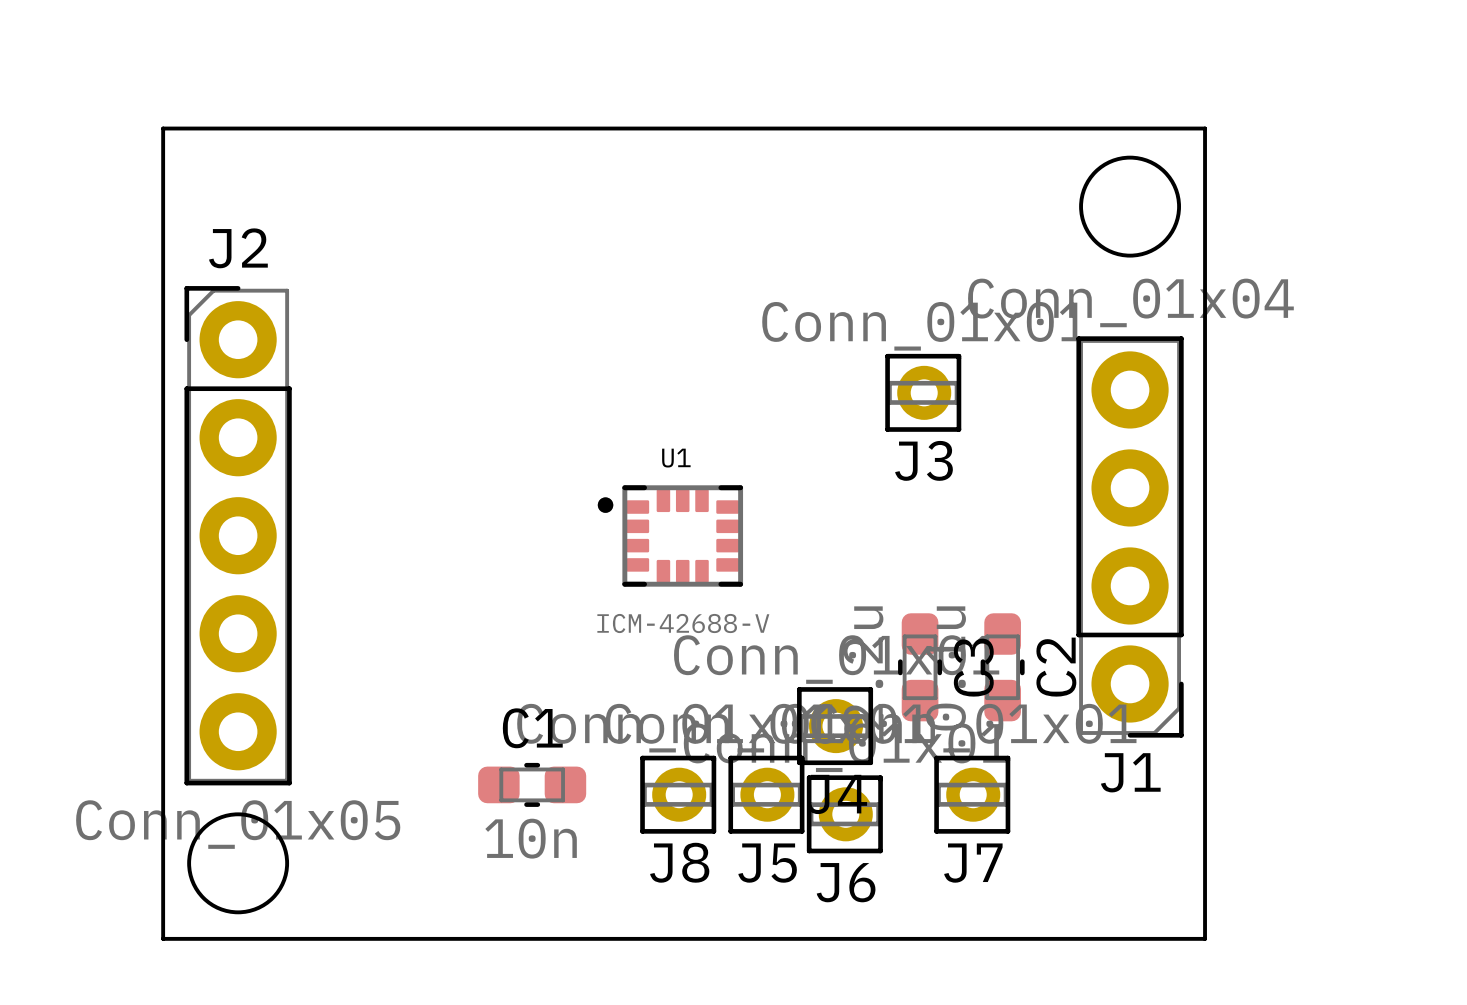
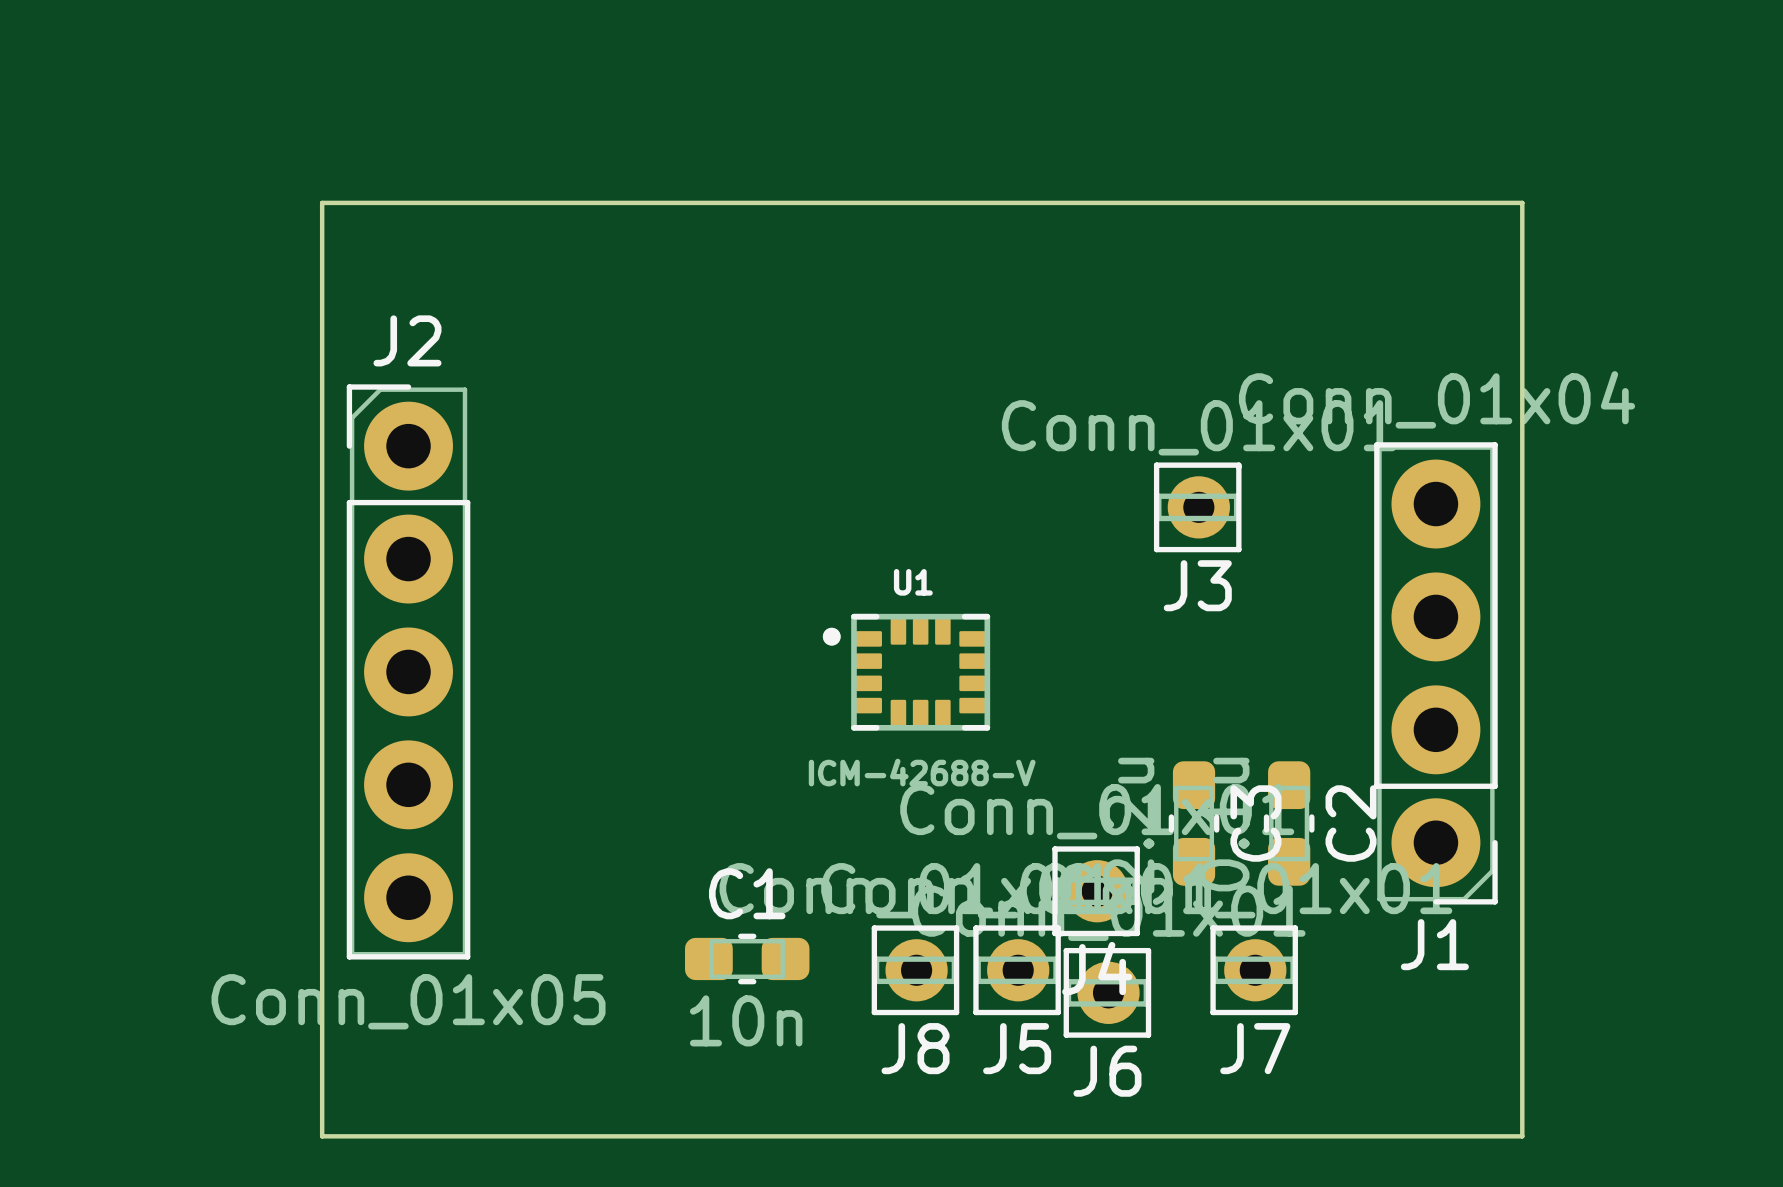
round board edge: [1079, 155, 1181, 258] -> none
round board edge: [187, 812, 290, 915] -> none

